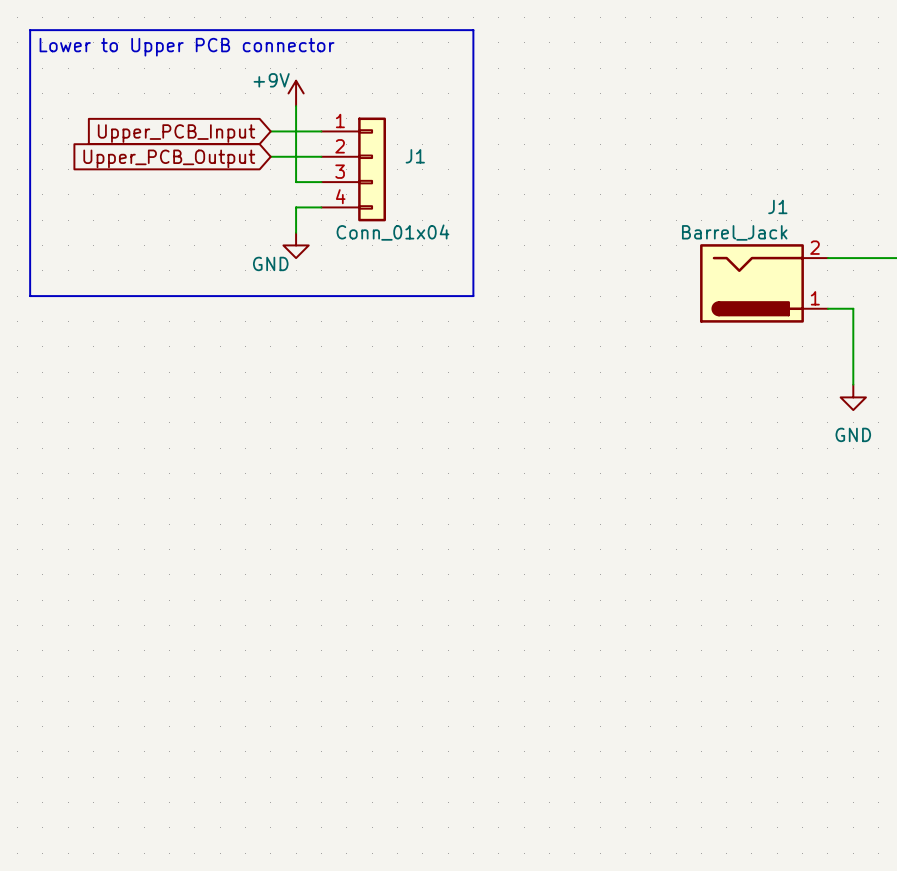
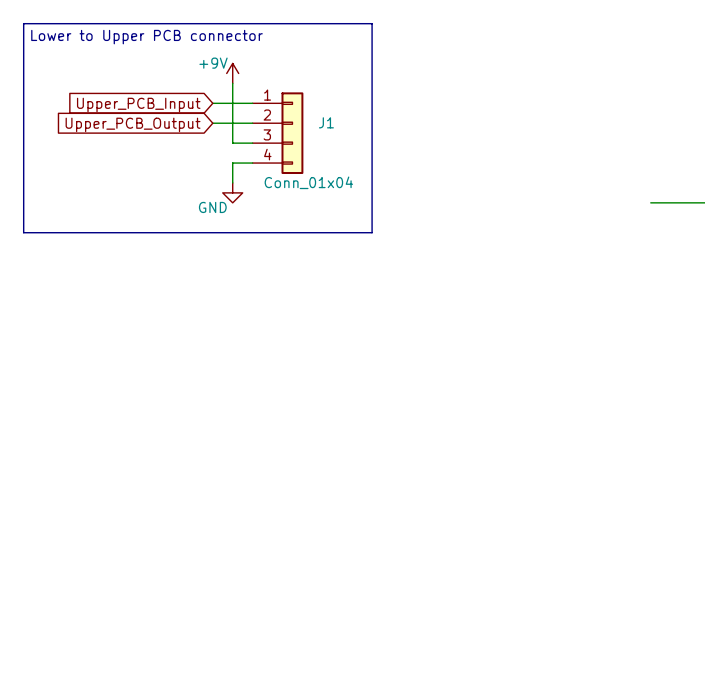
J1: Barrel_Jack (764, 283) -> none
wire: (827, 308) (853, 308) (853, 384) -> none
power symbol: GND (853, 397) -> none

